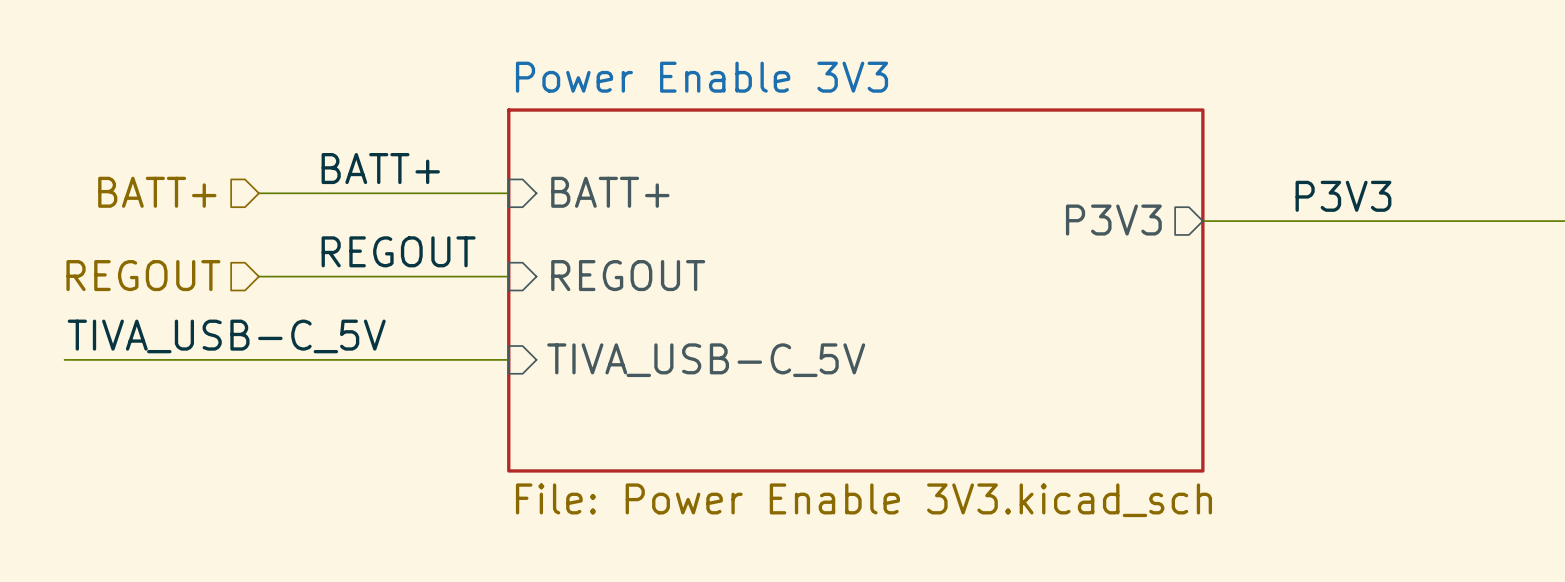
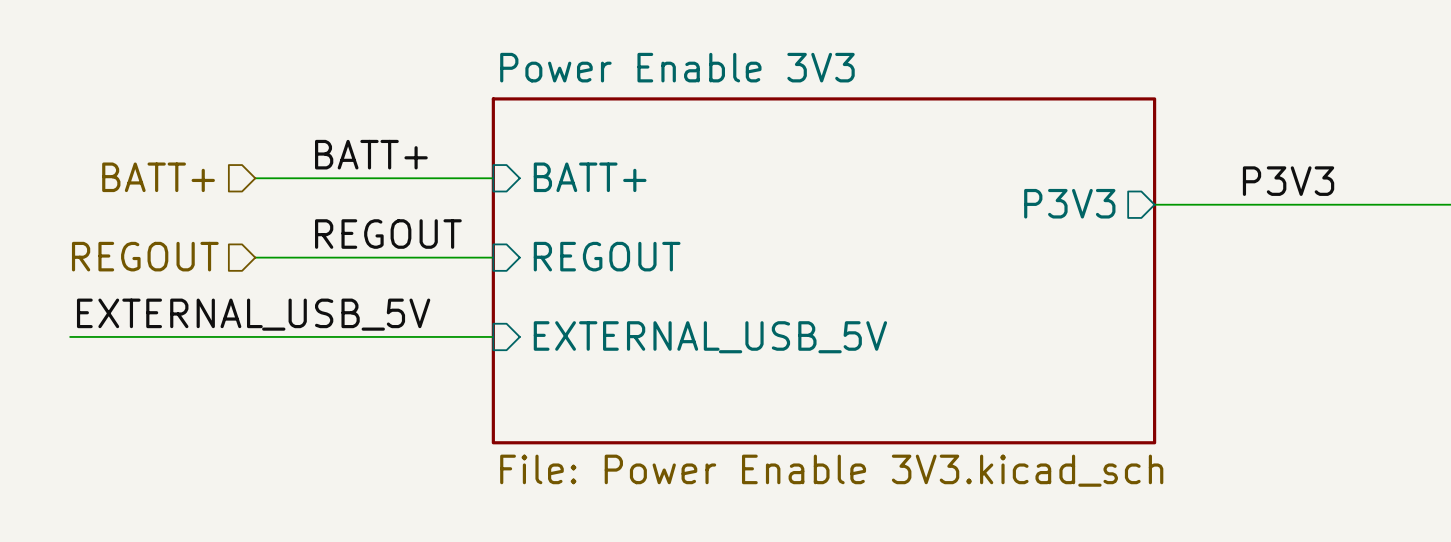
label: TIVA_USB-C_5V (226, 336) -> EXTERNAL_USB_5V (253, 314)
sheet pin: TIVA_USB-C_5V (706, 360) -> EXTERNAL_USB_5V (710, 337)

